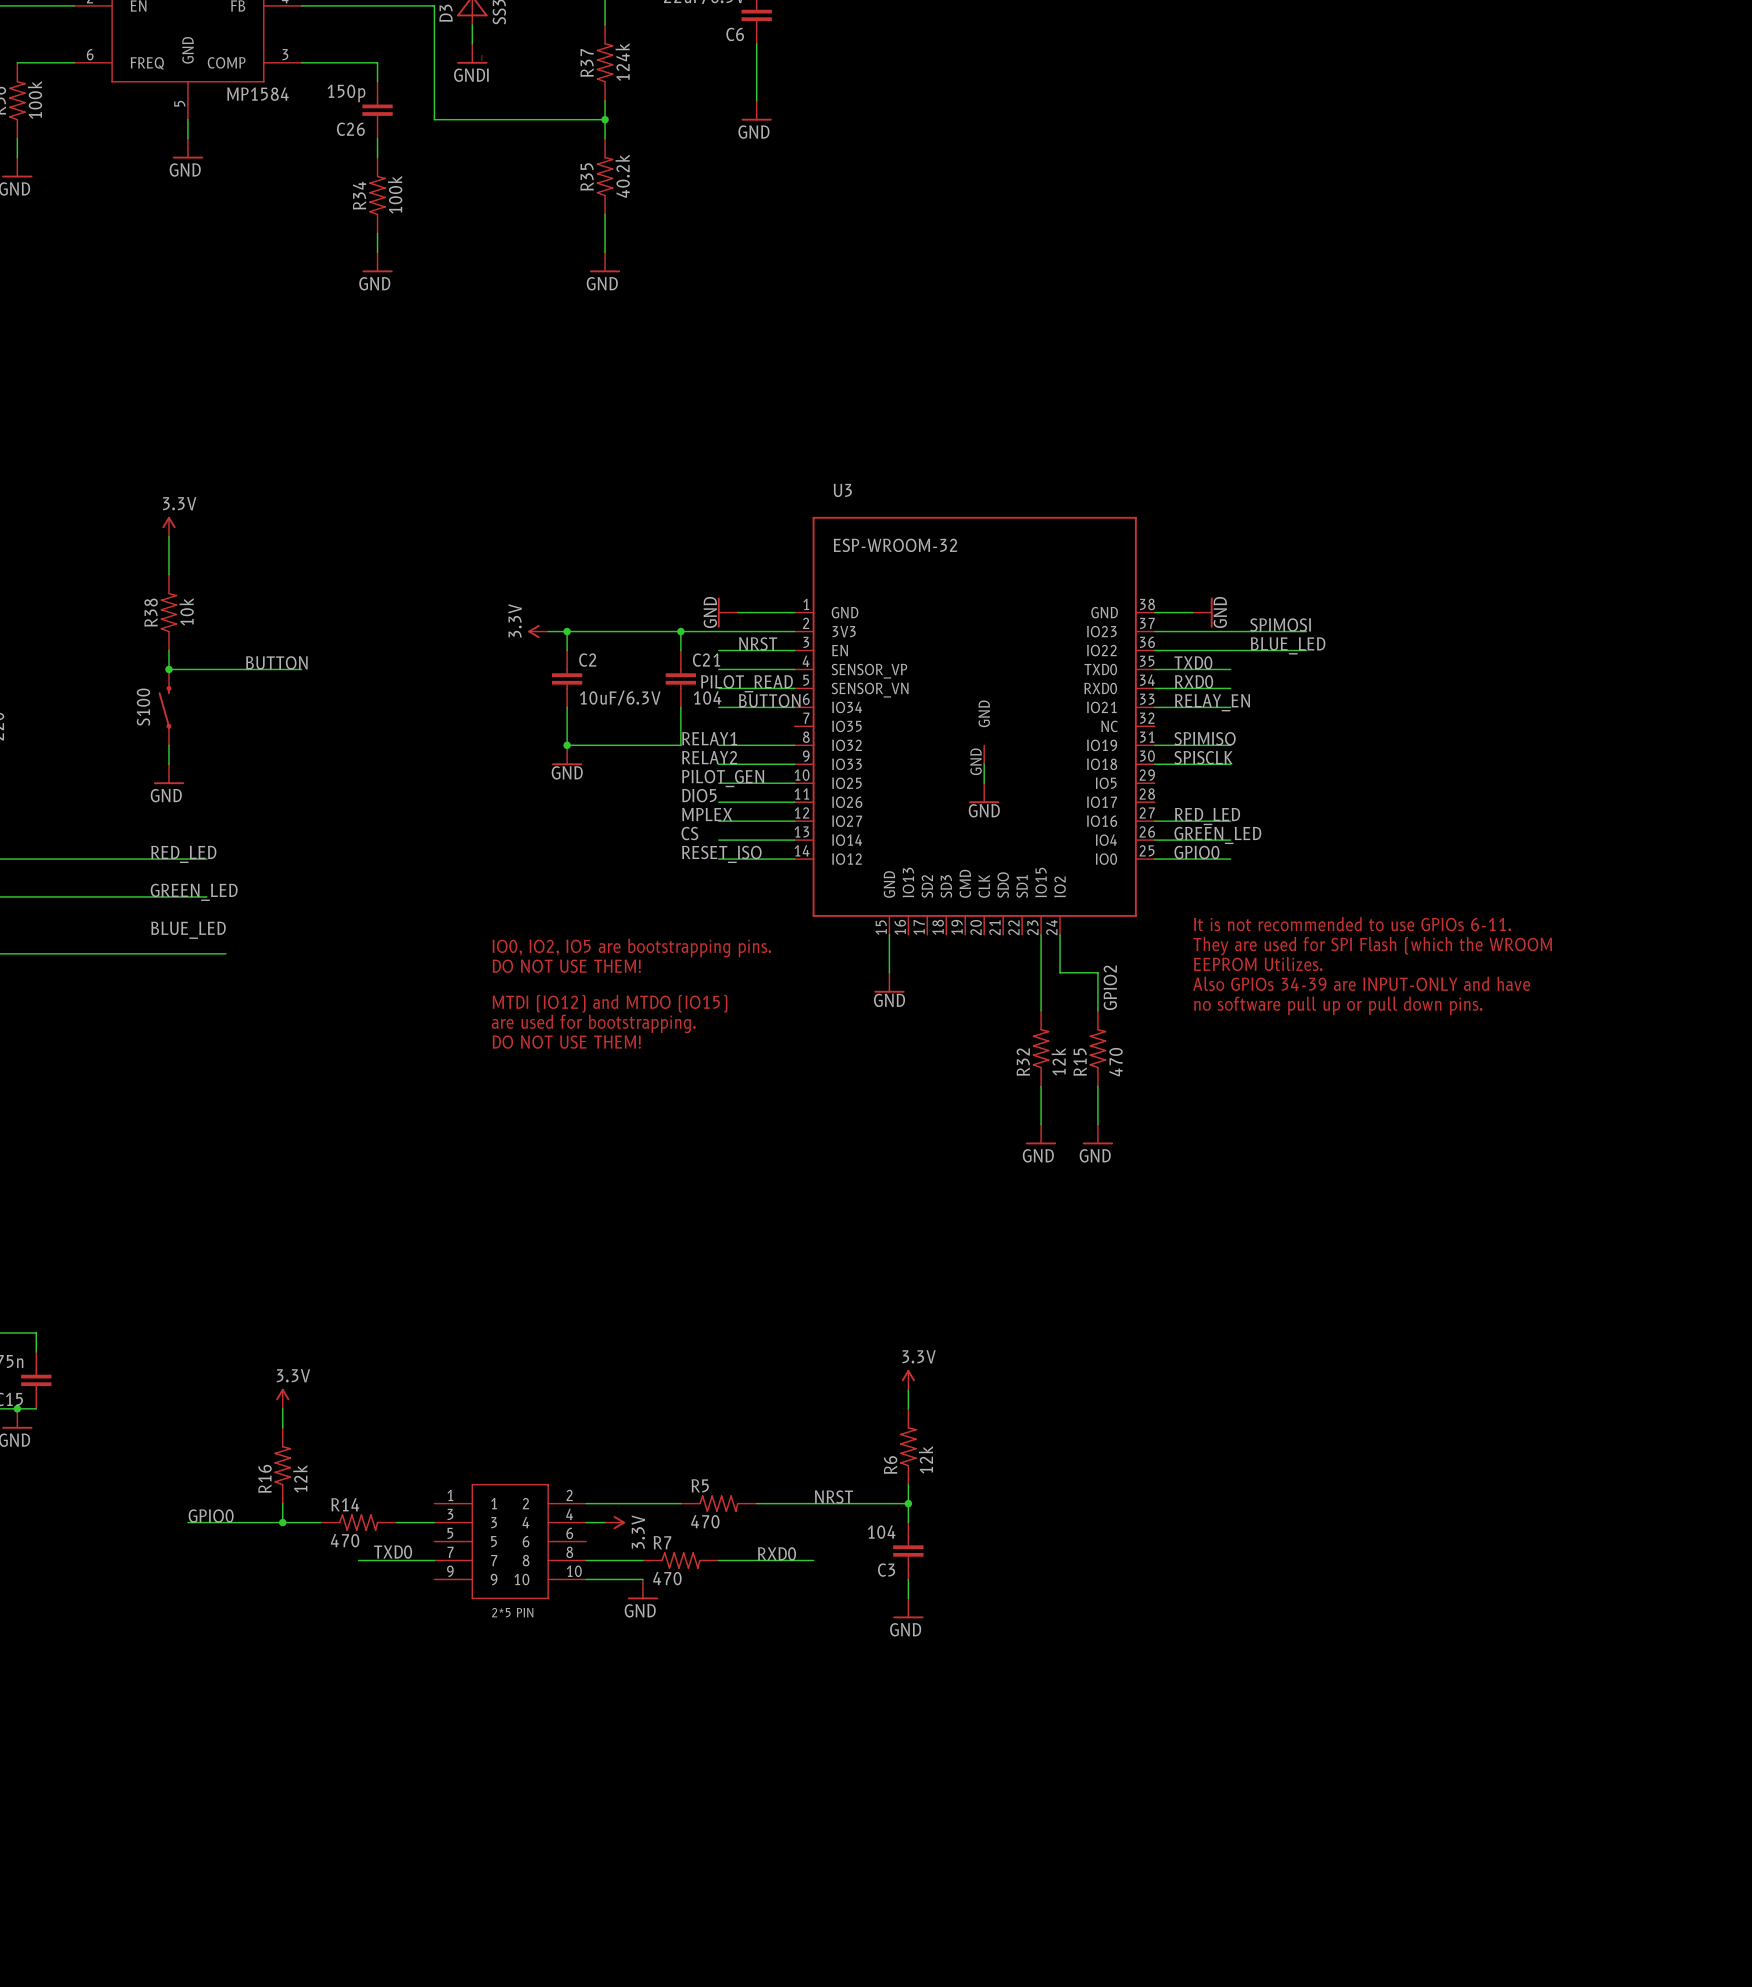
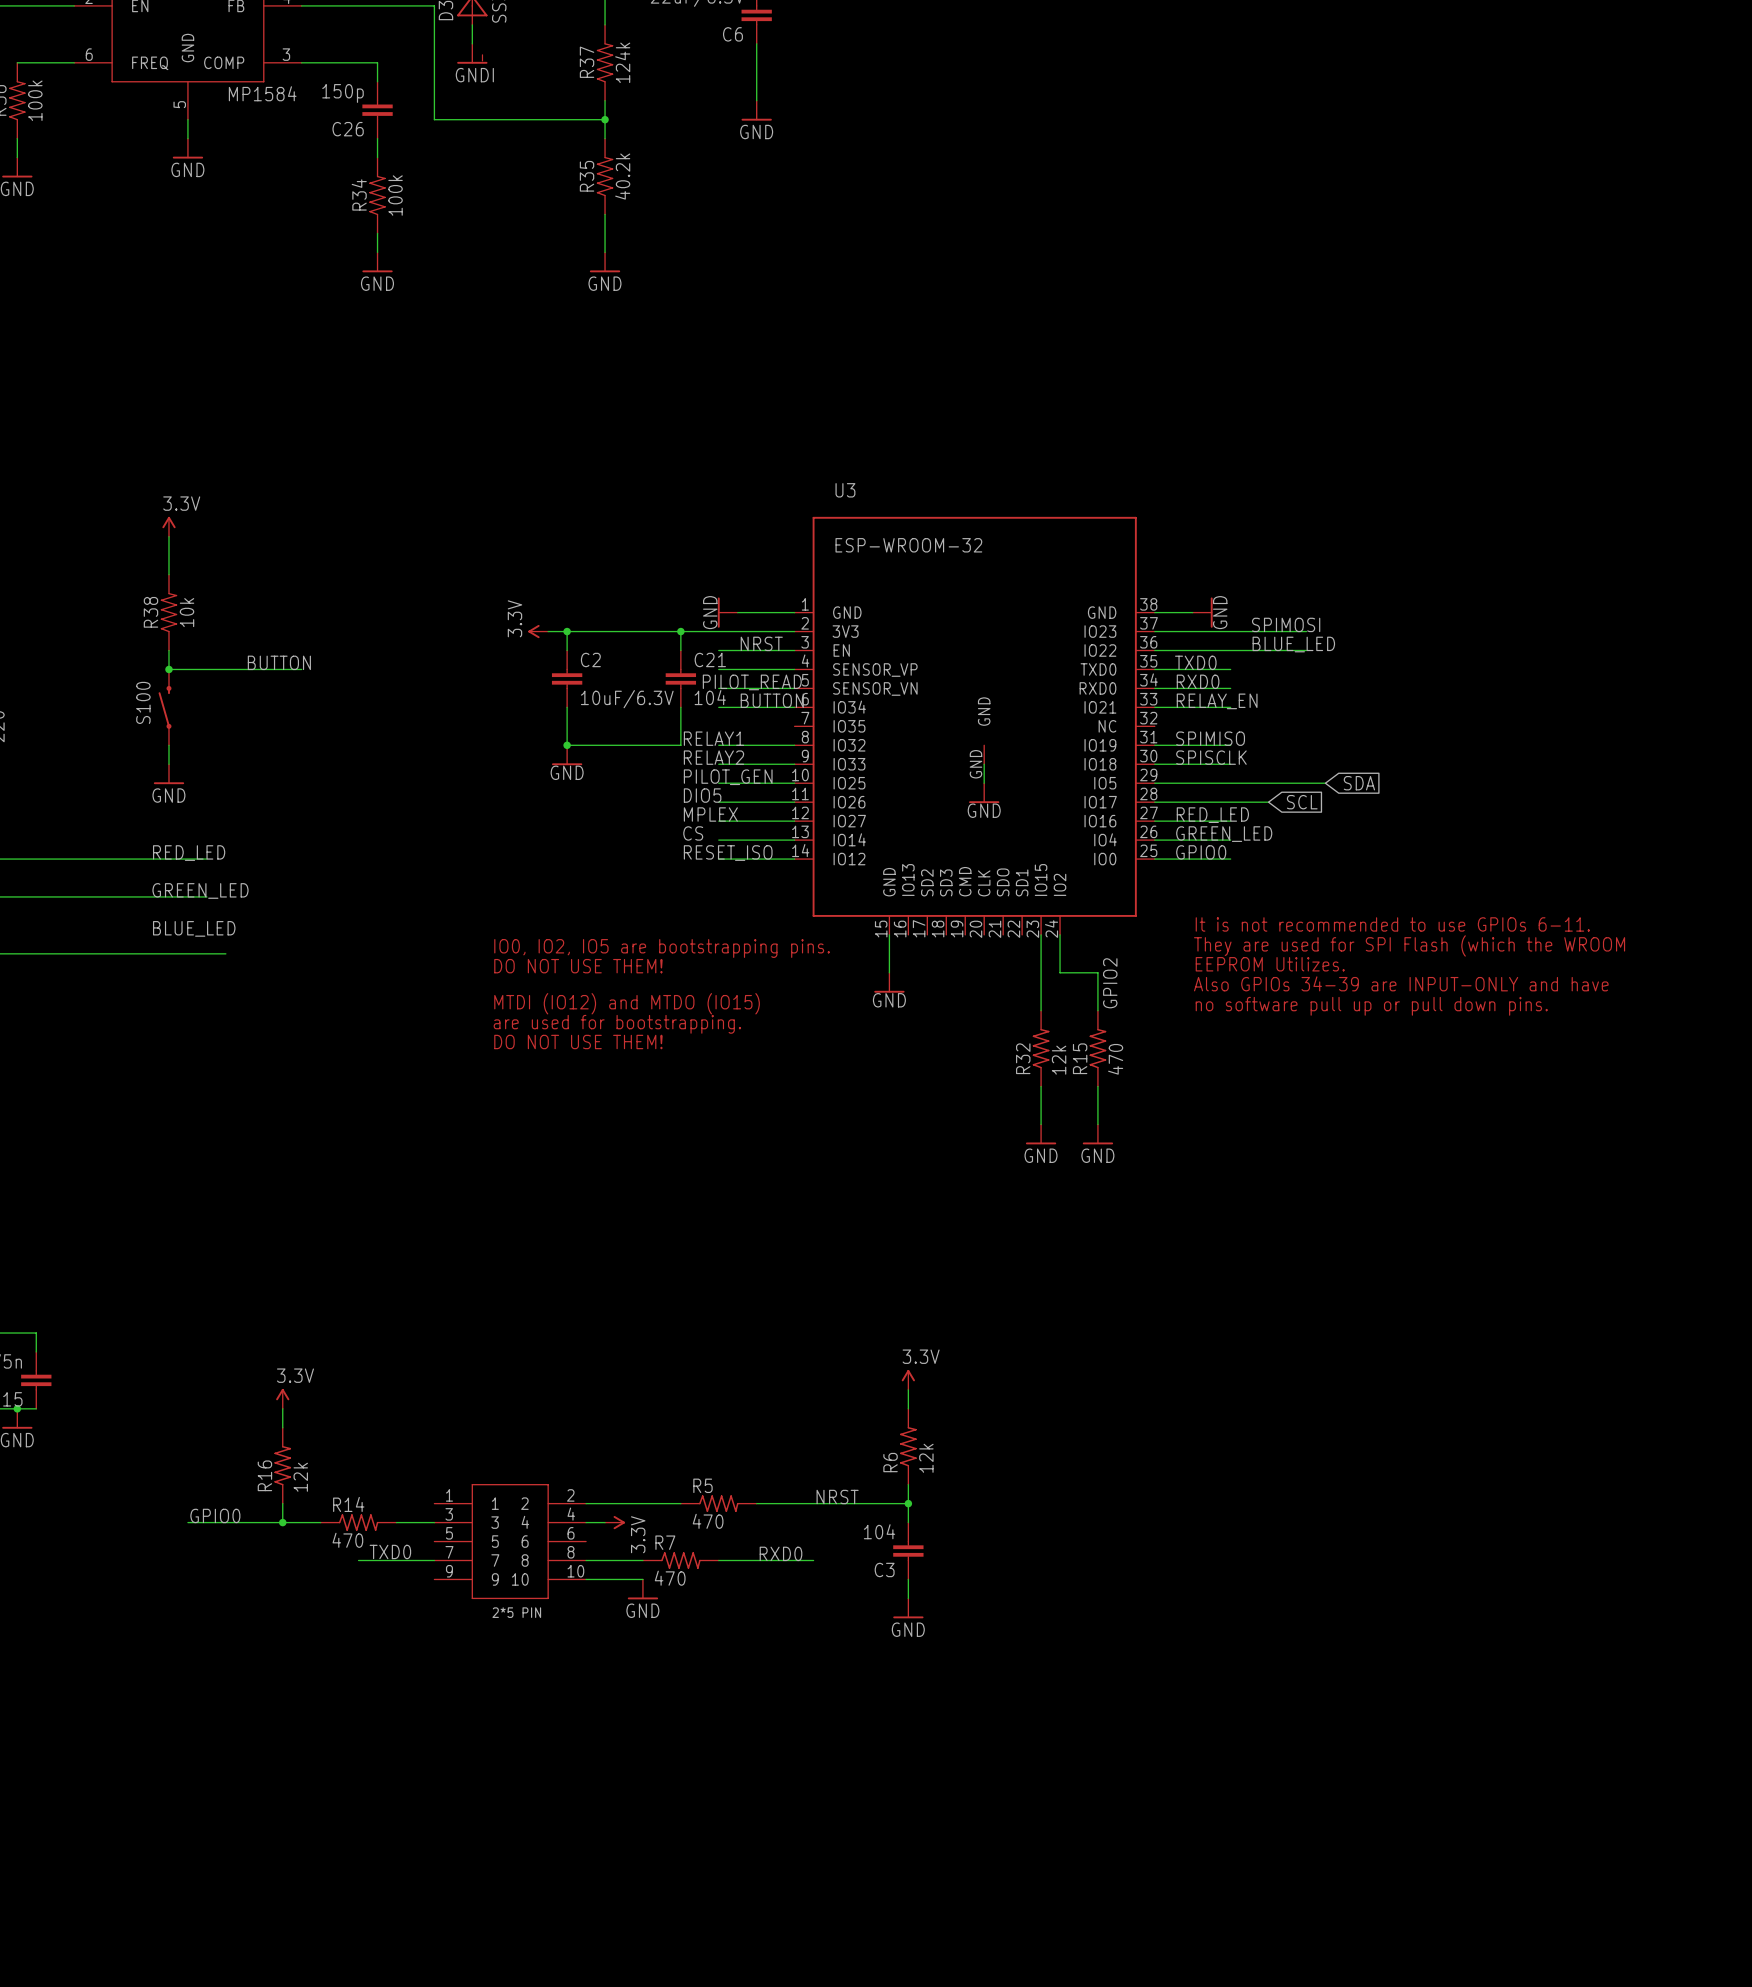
wire: none -> (1154, 783) (1325, 783)
global label: none -> SDA (1359, 783)
wire: none -> (1154, 802) (1268, 802)
global label: none -> SCL (1302, 802)

